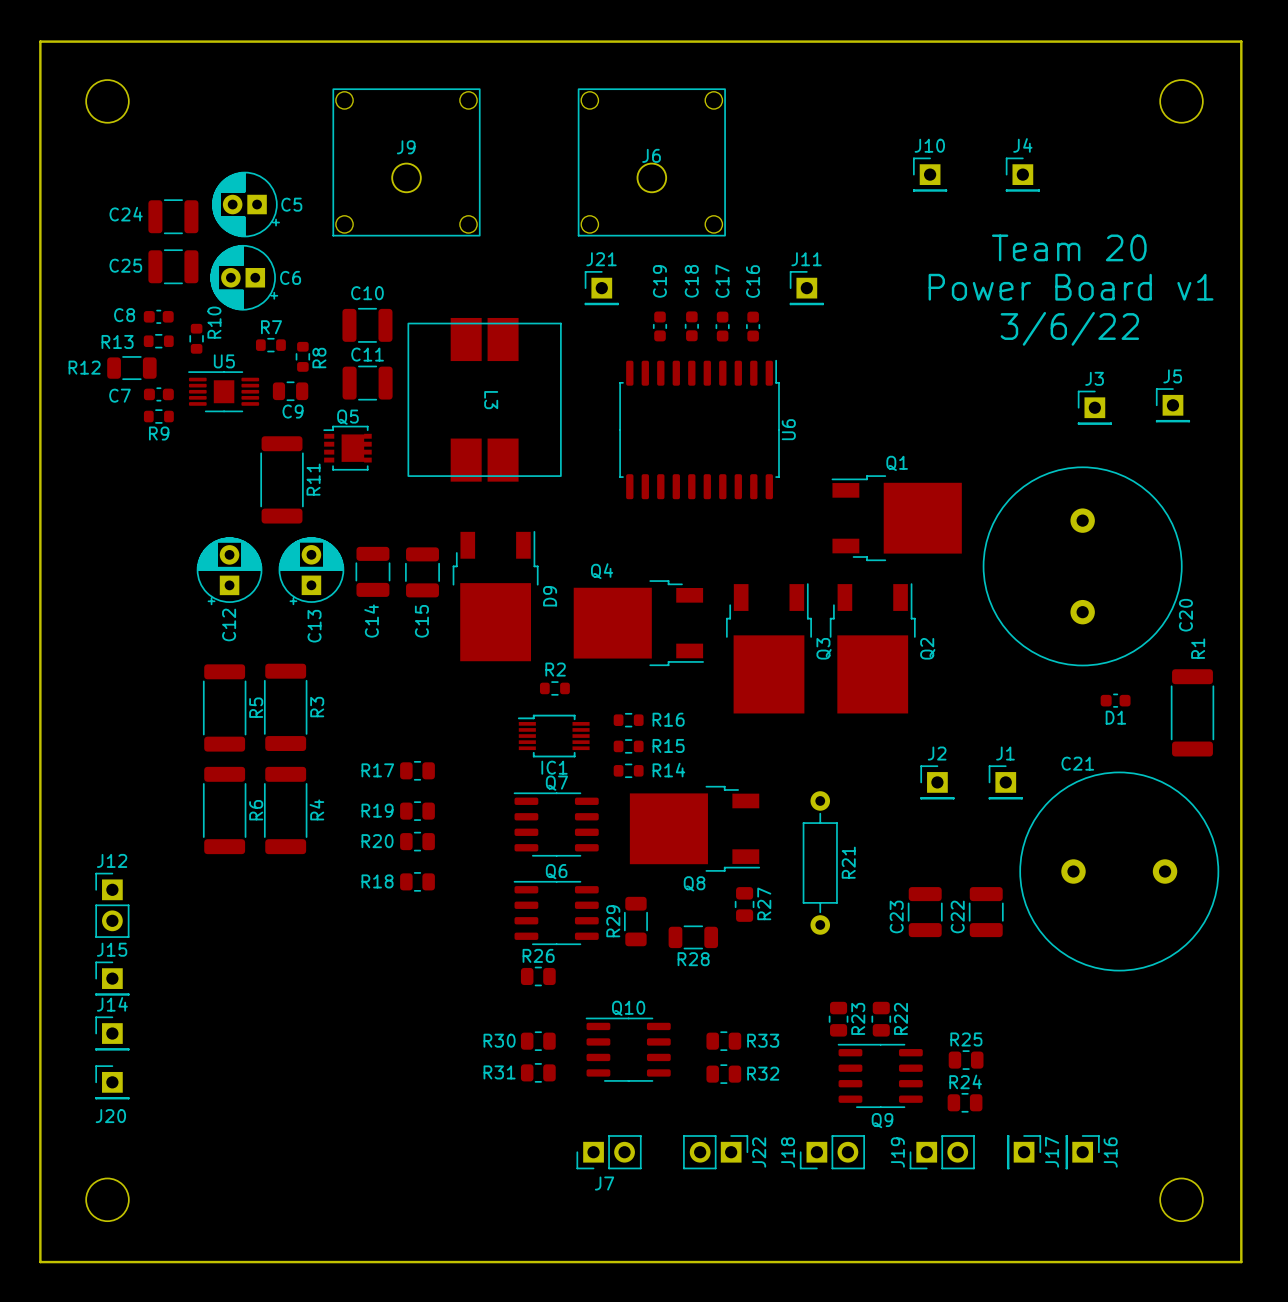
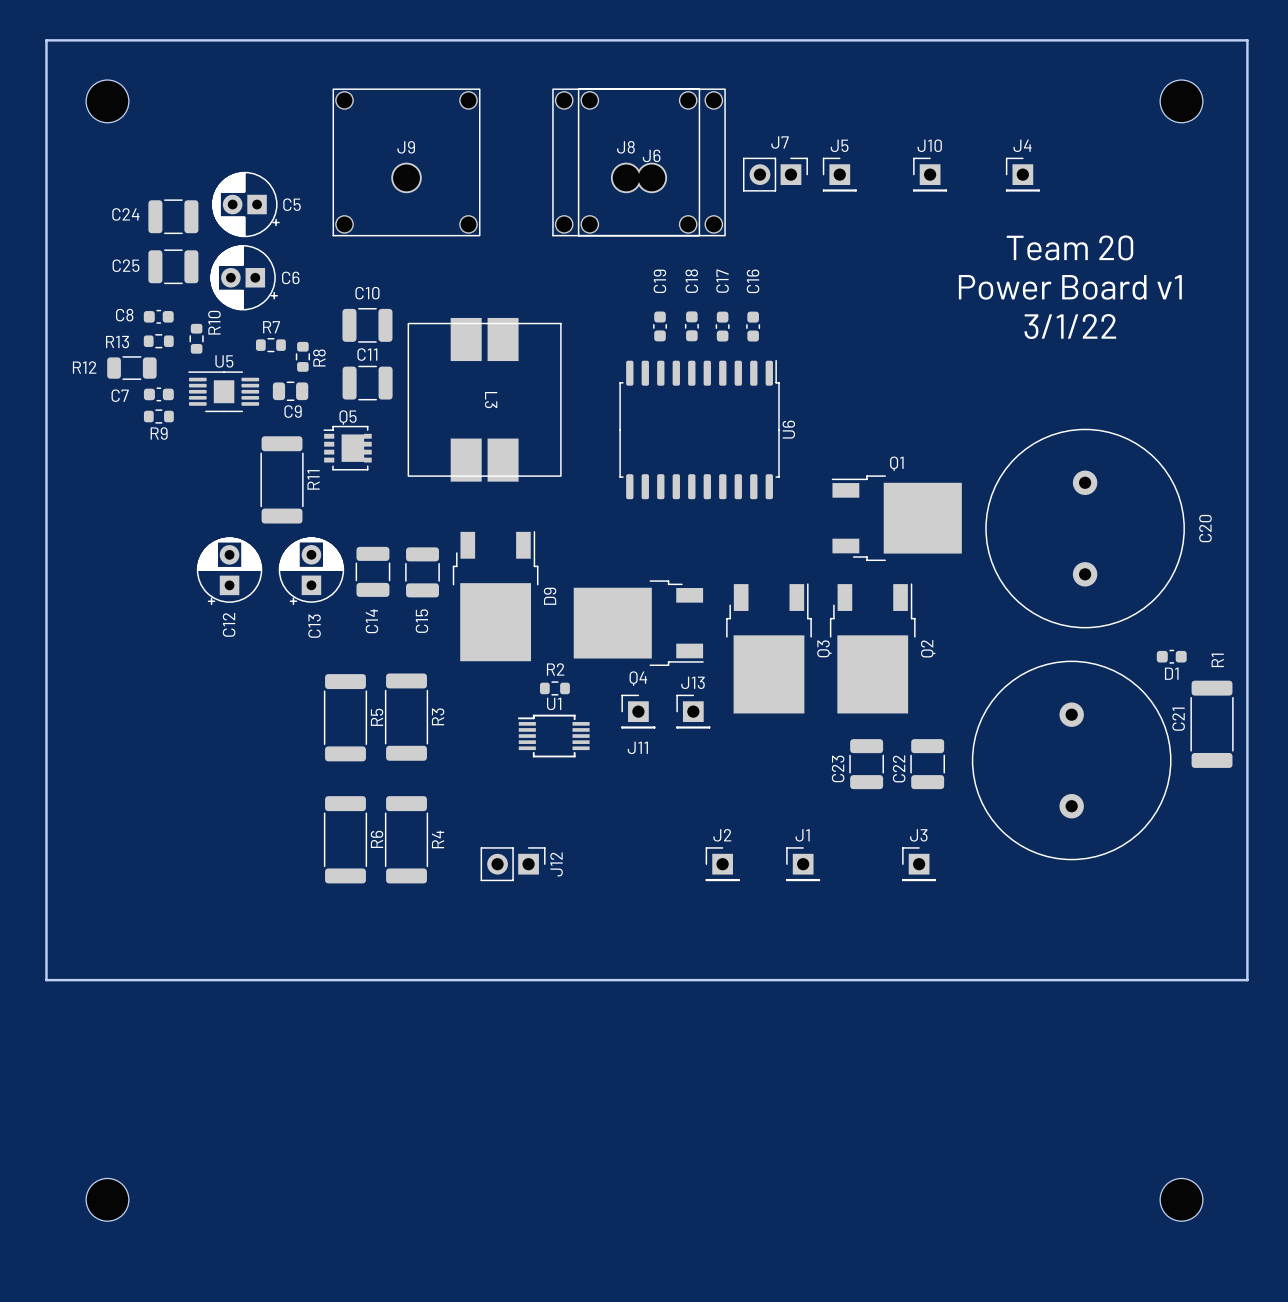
board edge: (40, 41) (1241, 41) (1241, 1262) (40, 1262) (40, 41) -> (46, 40) (46, 980) (1247, 980) (1247, 40) (46, 40)
J8: none -> (626, 162)
J11 name position: J11 (806, 259) -> J11 (637, 747)
J21: (601, 288) -> none
J11 position: (806, 288) -> (638, 711)
text: 3/6/22 (1069, 328) -> 3/1/22 (1070, 326)
J5 position: (1172, 405) -> (839, 174)
J3 position: (1094, 407) -> (919, 864)
C20 position: (1082, 566) -> (1085, 528)
Q4 name position: Q4 (602, 571) -> Q4 (638, 678)
C20 name position: C20 (1185, 615) -> C20 (1205, 528)
D1 position: (1115, 700) -> (1171, 656)
R5 position: (224, 707) -> (345, 717)
R3 position: (285, 707) -> (406, 717)
J13: none -> (693, 711)
R1 position: (1192, 712) -> (1212, 724)
R16: (628, 720) -> none
R15: (628, 746) -> none
IC1 name: IC1 (554, 767) -> U1 (554, 703)
R17: (417, 770) -> none
R14: (628, 770) -> none
J2 position: (937, 782) -> (722, 864)
J1 position: (1005, 782) -> (803, 864)
R6 position: (224, 810) -> (345, 839)
R4 position: (285, 810) -> (406, 839)
R19: (417, 811) -> none
Q7: (556, 824) -> none
Q8: (694, 828) -> none
R20: (417, 841) -> none
R21: (820, 862) -> none
C21 rotation: 0° (1119, 871) -> 90° clockwise (1071, 760)
C21 position: (1119, 871) -> (1071, 760)
R18: (417, 881) -> none
R27: (744, 904) -> none
J12 rotation: 0° (112, 905) -> 90° clockwise (513, 864)
J12 position: (112, 905) -> (513, 864)
C23 position: (925, 912) -> (866, 764)
C22 position: (986, 912) -> (927, 764)
Q6: (556, 913) -> none
R29: (635, 921) -> none
R28: (693, 937) -> none
R26: (538, 976) -> none
J15: (112, 978) -> none
R23: (838, 1019) -> none
R22: (881, 1019) -> none
J14: (112, 1033) -> none
R30: (538, 1041) -> none
R33: (723, 1041) -> none
Q10: (628, 1049) -> none
R25: (966, 1060) -> none
R31: (538, 1072) -> none
R32: (723, 1074) -> none
Q9: (880, 1075) -> none
J20: (112, 1082) -> none
R24: (965, 1102) -> none
J7 rotation: 0° (609, 1152) -> 180° (775, 174)
J7 position: (609, 1152) -> (775, 174)
J22: (715, 1152) -> none
J18: (832, 1152) -> none
J19: (942, 1152) -> none
J17: (1024, 1152) -> none
J16: (1082, 1152) -> none

